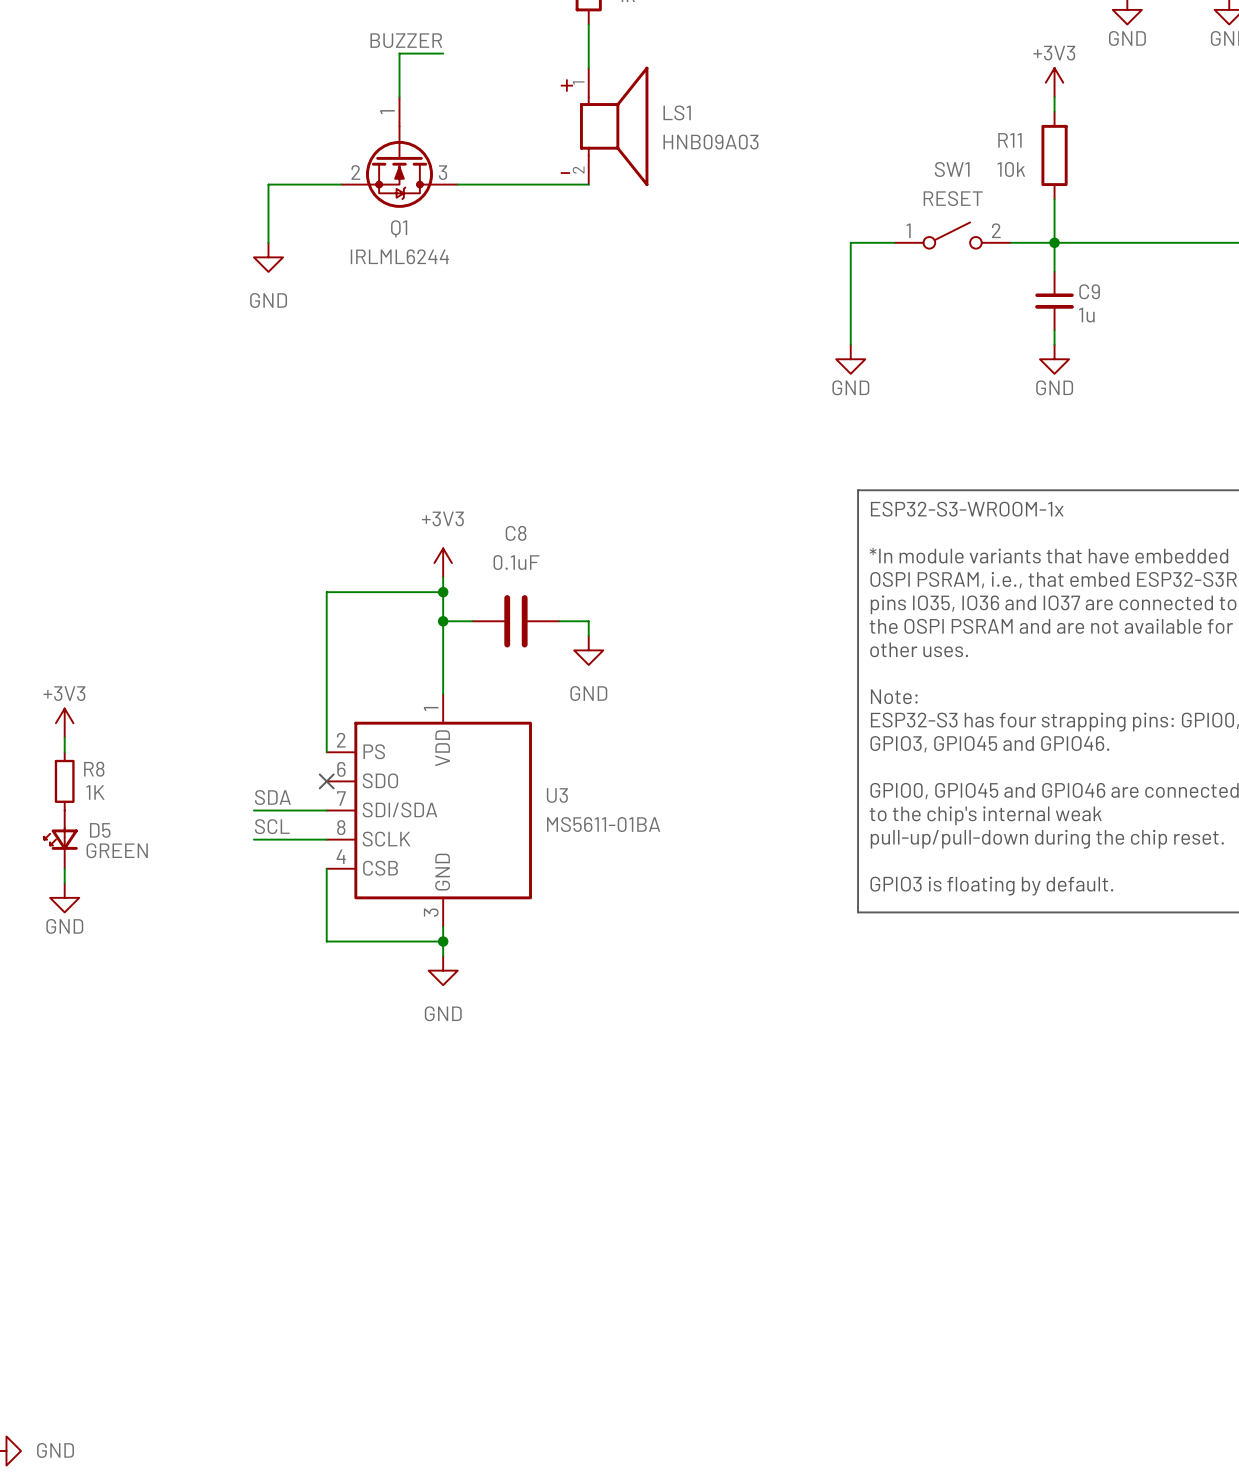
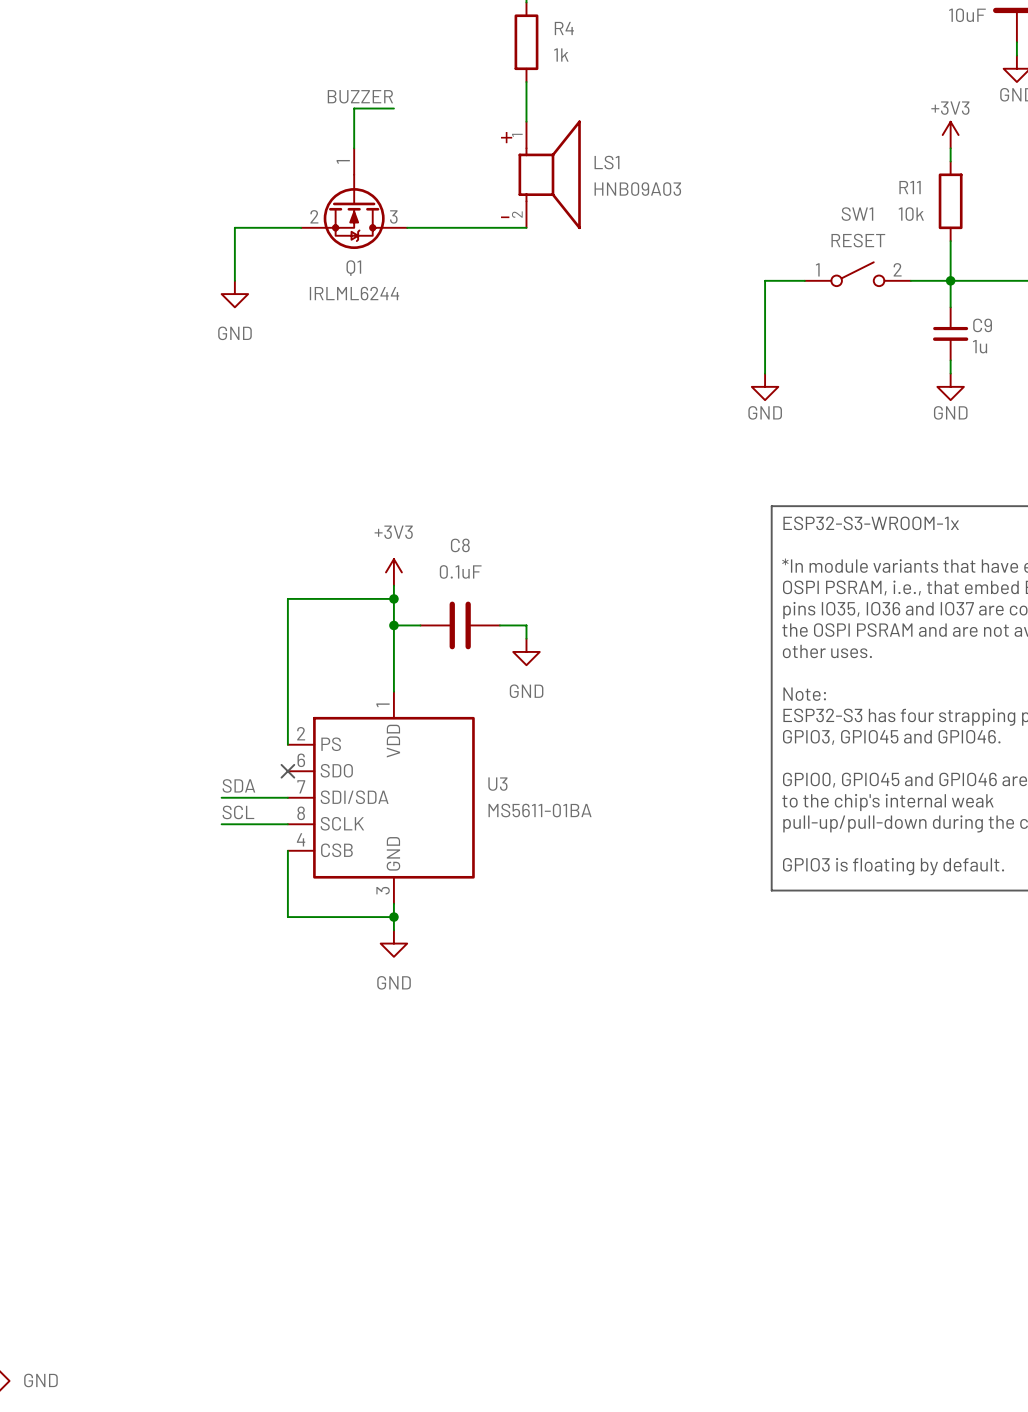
power symbol: +3V3 (64, 723) -> none
wire: (64, 737) (64, 752) -> none
R8: 1K (64, 781) -> none
D5: GREEN (61, 839) -> none
wire: (64, 868) (64, 883) -> none
power symbol: GND (64, 897) -> none

